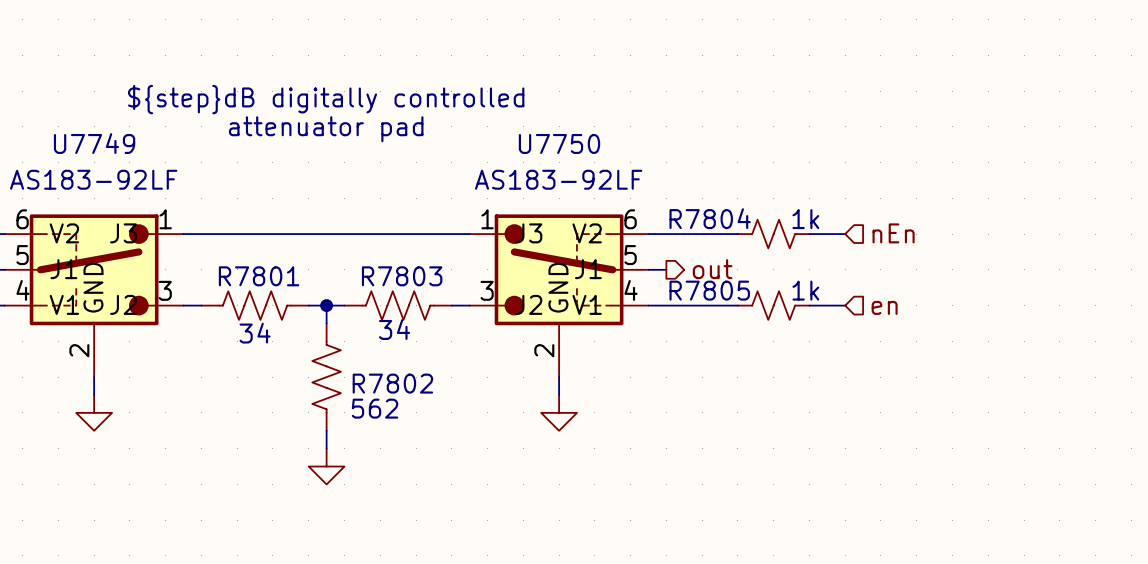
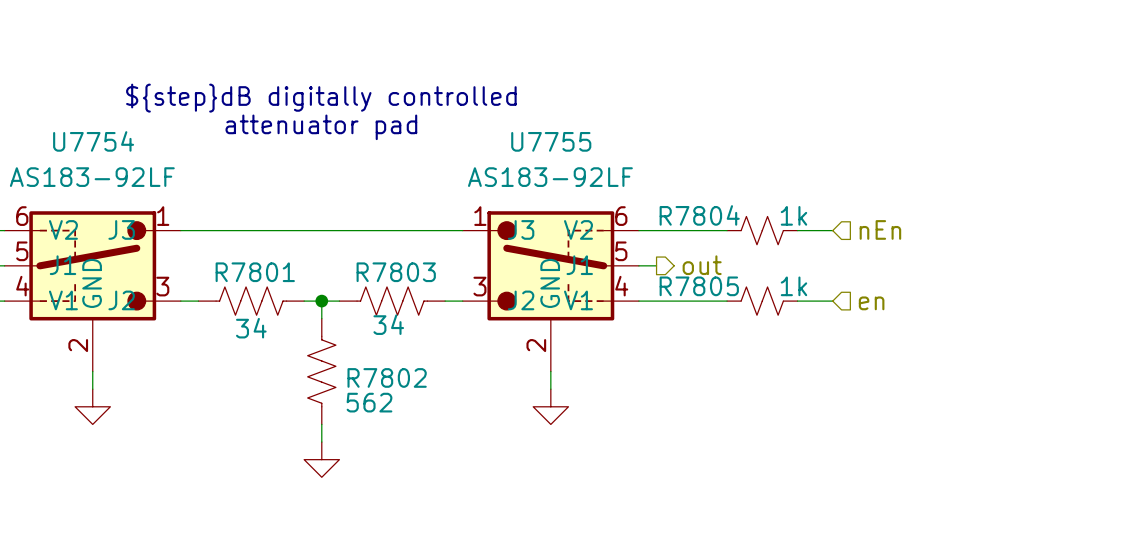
U7749 name: U7749 (94, 143) -> U7754 (93, 141)
U7750 name: U7750 (559, 143) -> U7755 (551, 141)

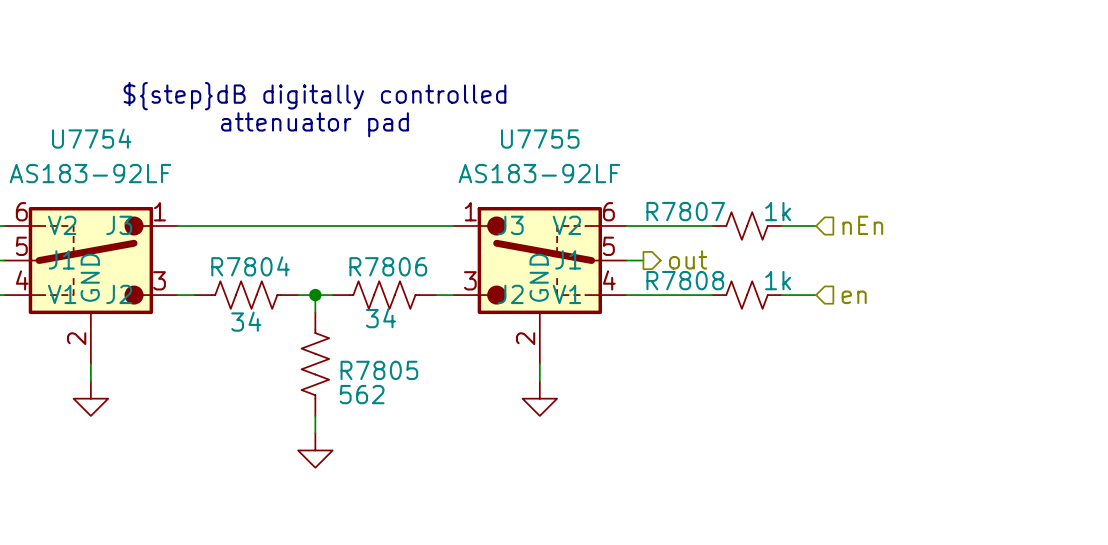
R7804 name: R7804 (699, 215) -> R7807 (685, 211)
R7801 name: R7801 (255, 272) -> R7804 (250, 266)
R7803 name: R7803 (396, 272) -> R7806 (388, 266)
R7805 name: R7805 (699, 286) -> R7808 (685, 280)
R7802 name: R7802 (387, 377) -> R7805 (379, 370)

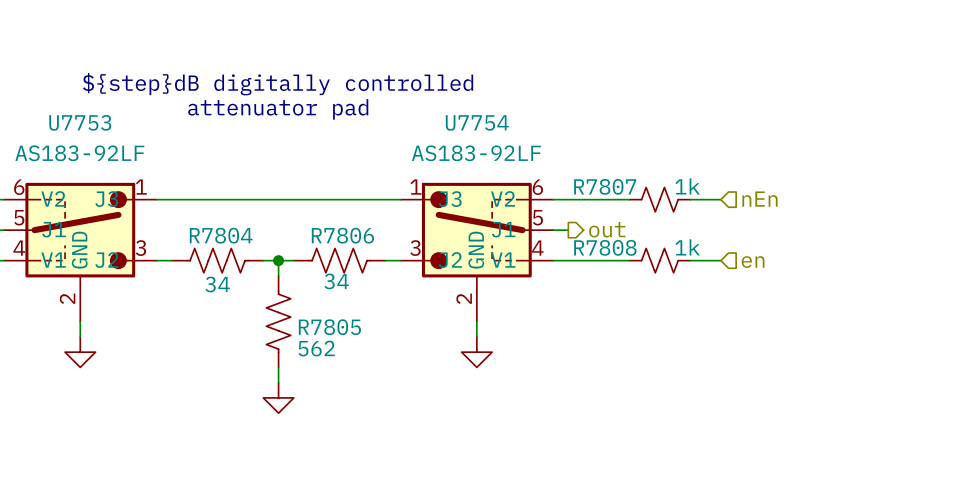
U7754 name: U7754 (91, 138) -> U7753 (80, 122)
U7755 name: U7755 (540, 139) -> U7754 (477, 122)

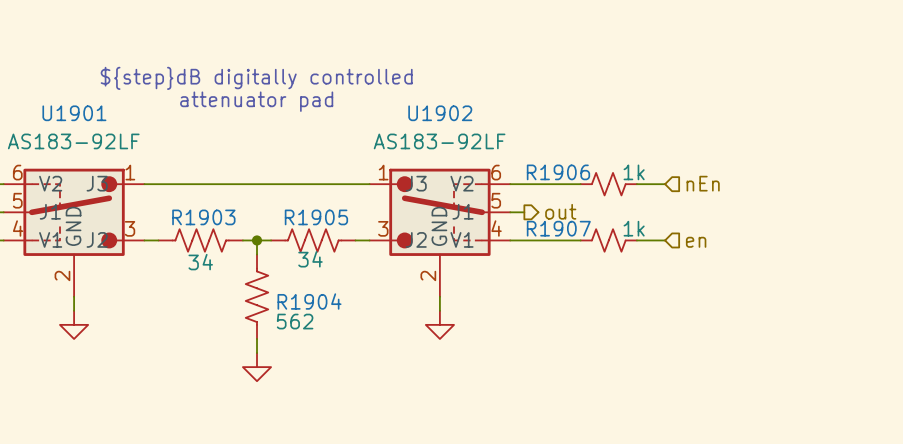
U7753 name: U7753 (80, 122) -> U1901 (74, 113)
U7754 name: U7754 (477, 122) -> U1902 (440, 113)
R7807 name: R7807 (605, 186) -> R1906 (558, 172)
R7804 name: R7804 (221, 235) -> R1903 (203, 217)
R7806 name: R7806 (342, 235) -> R1905 (316, 217)
R7808 name: R7808 (605, 247) -> R1907 (558, 228)
R7805 name: R7805 (329, 327) -> R1904 (309, 301)

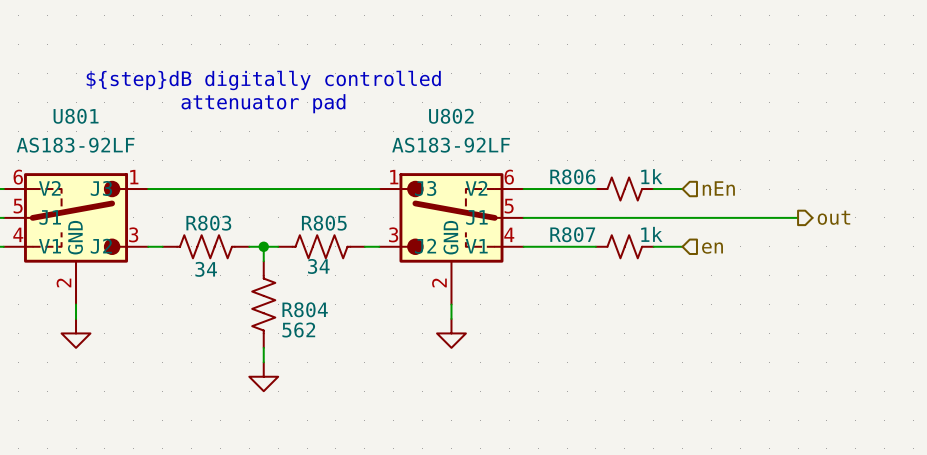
U1901 name: U1901 (74, 113) -> U801 (76, 116)
U1902 name: U1902 (440, 113) -> U802 (451, 116)
R1906 name: R1906 (558, 172) -> R806 (572, 176)
hierarchical label position: out (560, 211) -> out (833, 217)
wire: none -> (538, 217) (798, 217)
R1903 name: R1903 (203, 217) -> R803 (208, 223)
R1905 name: R1905 (316, 217) -> R805 (324, 223)
R1907 name: R1907 (558, 228) -> R807 (572, 234)
R1904 name: R1904 (309, 301) -> R804 (305, 309)

